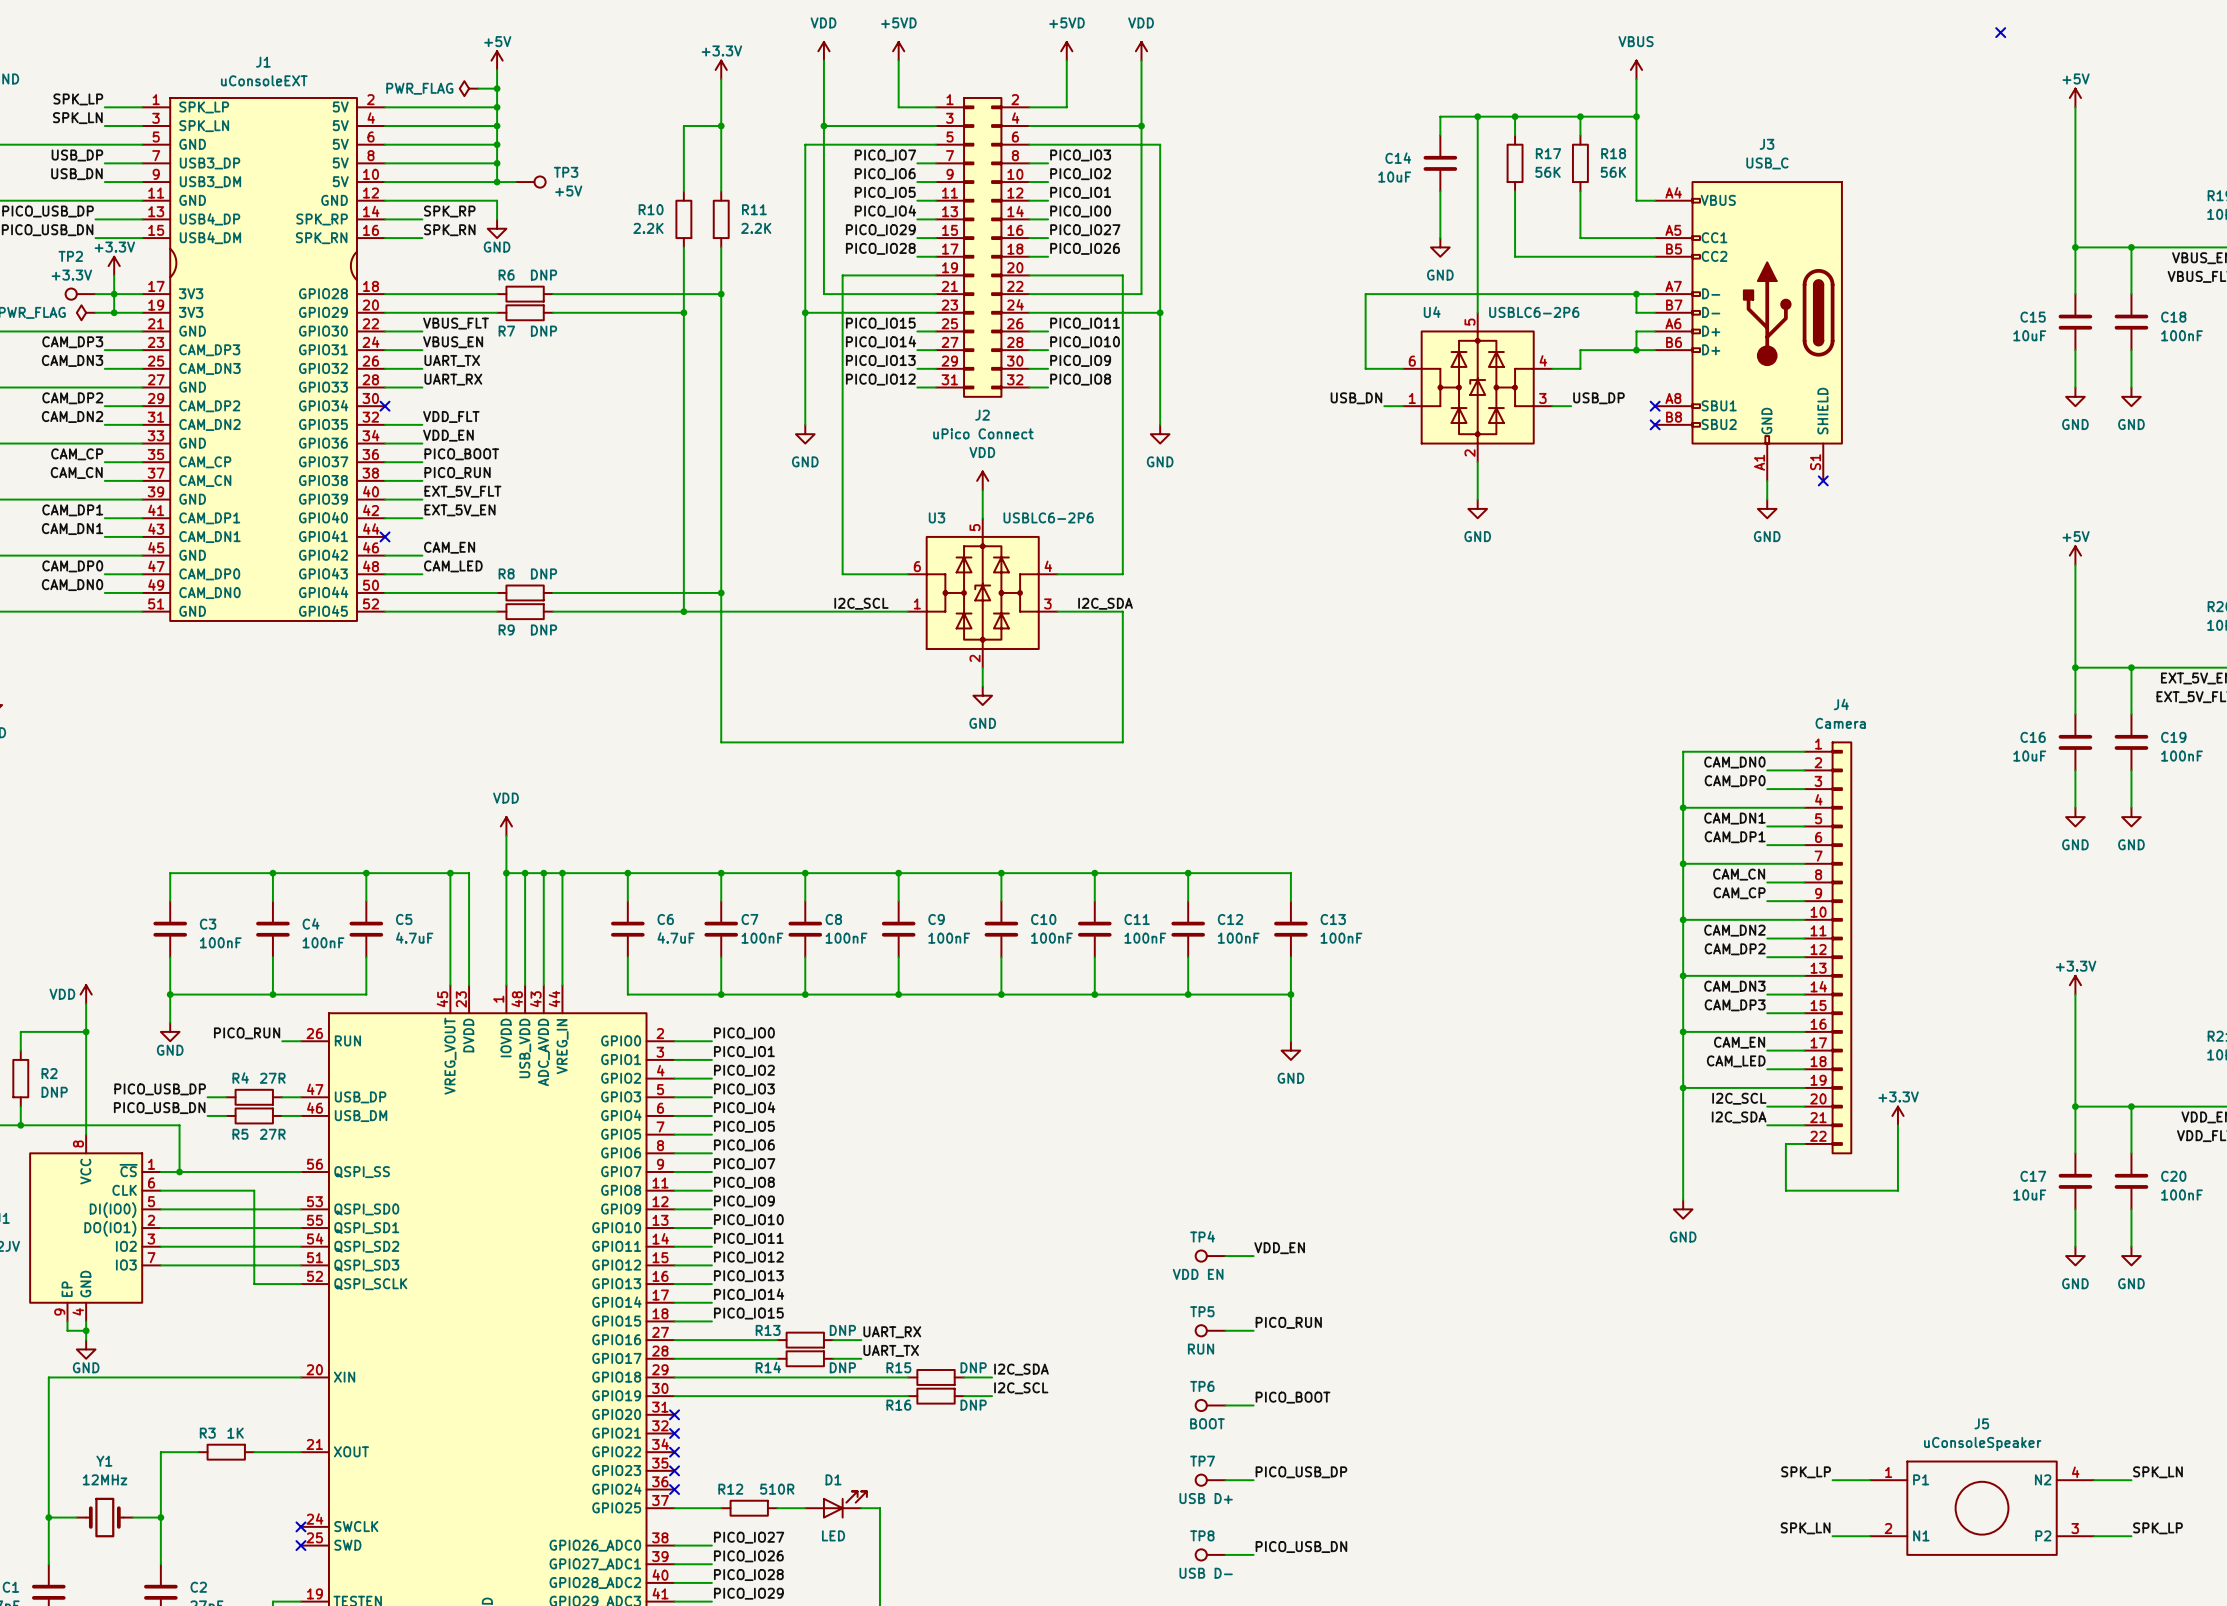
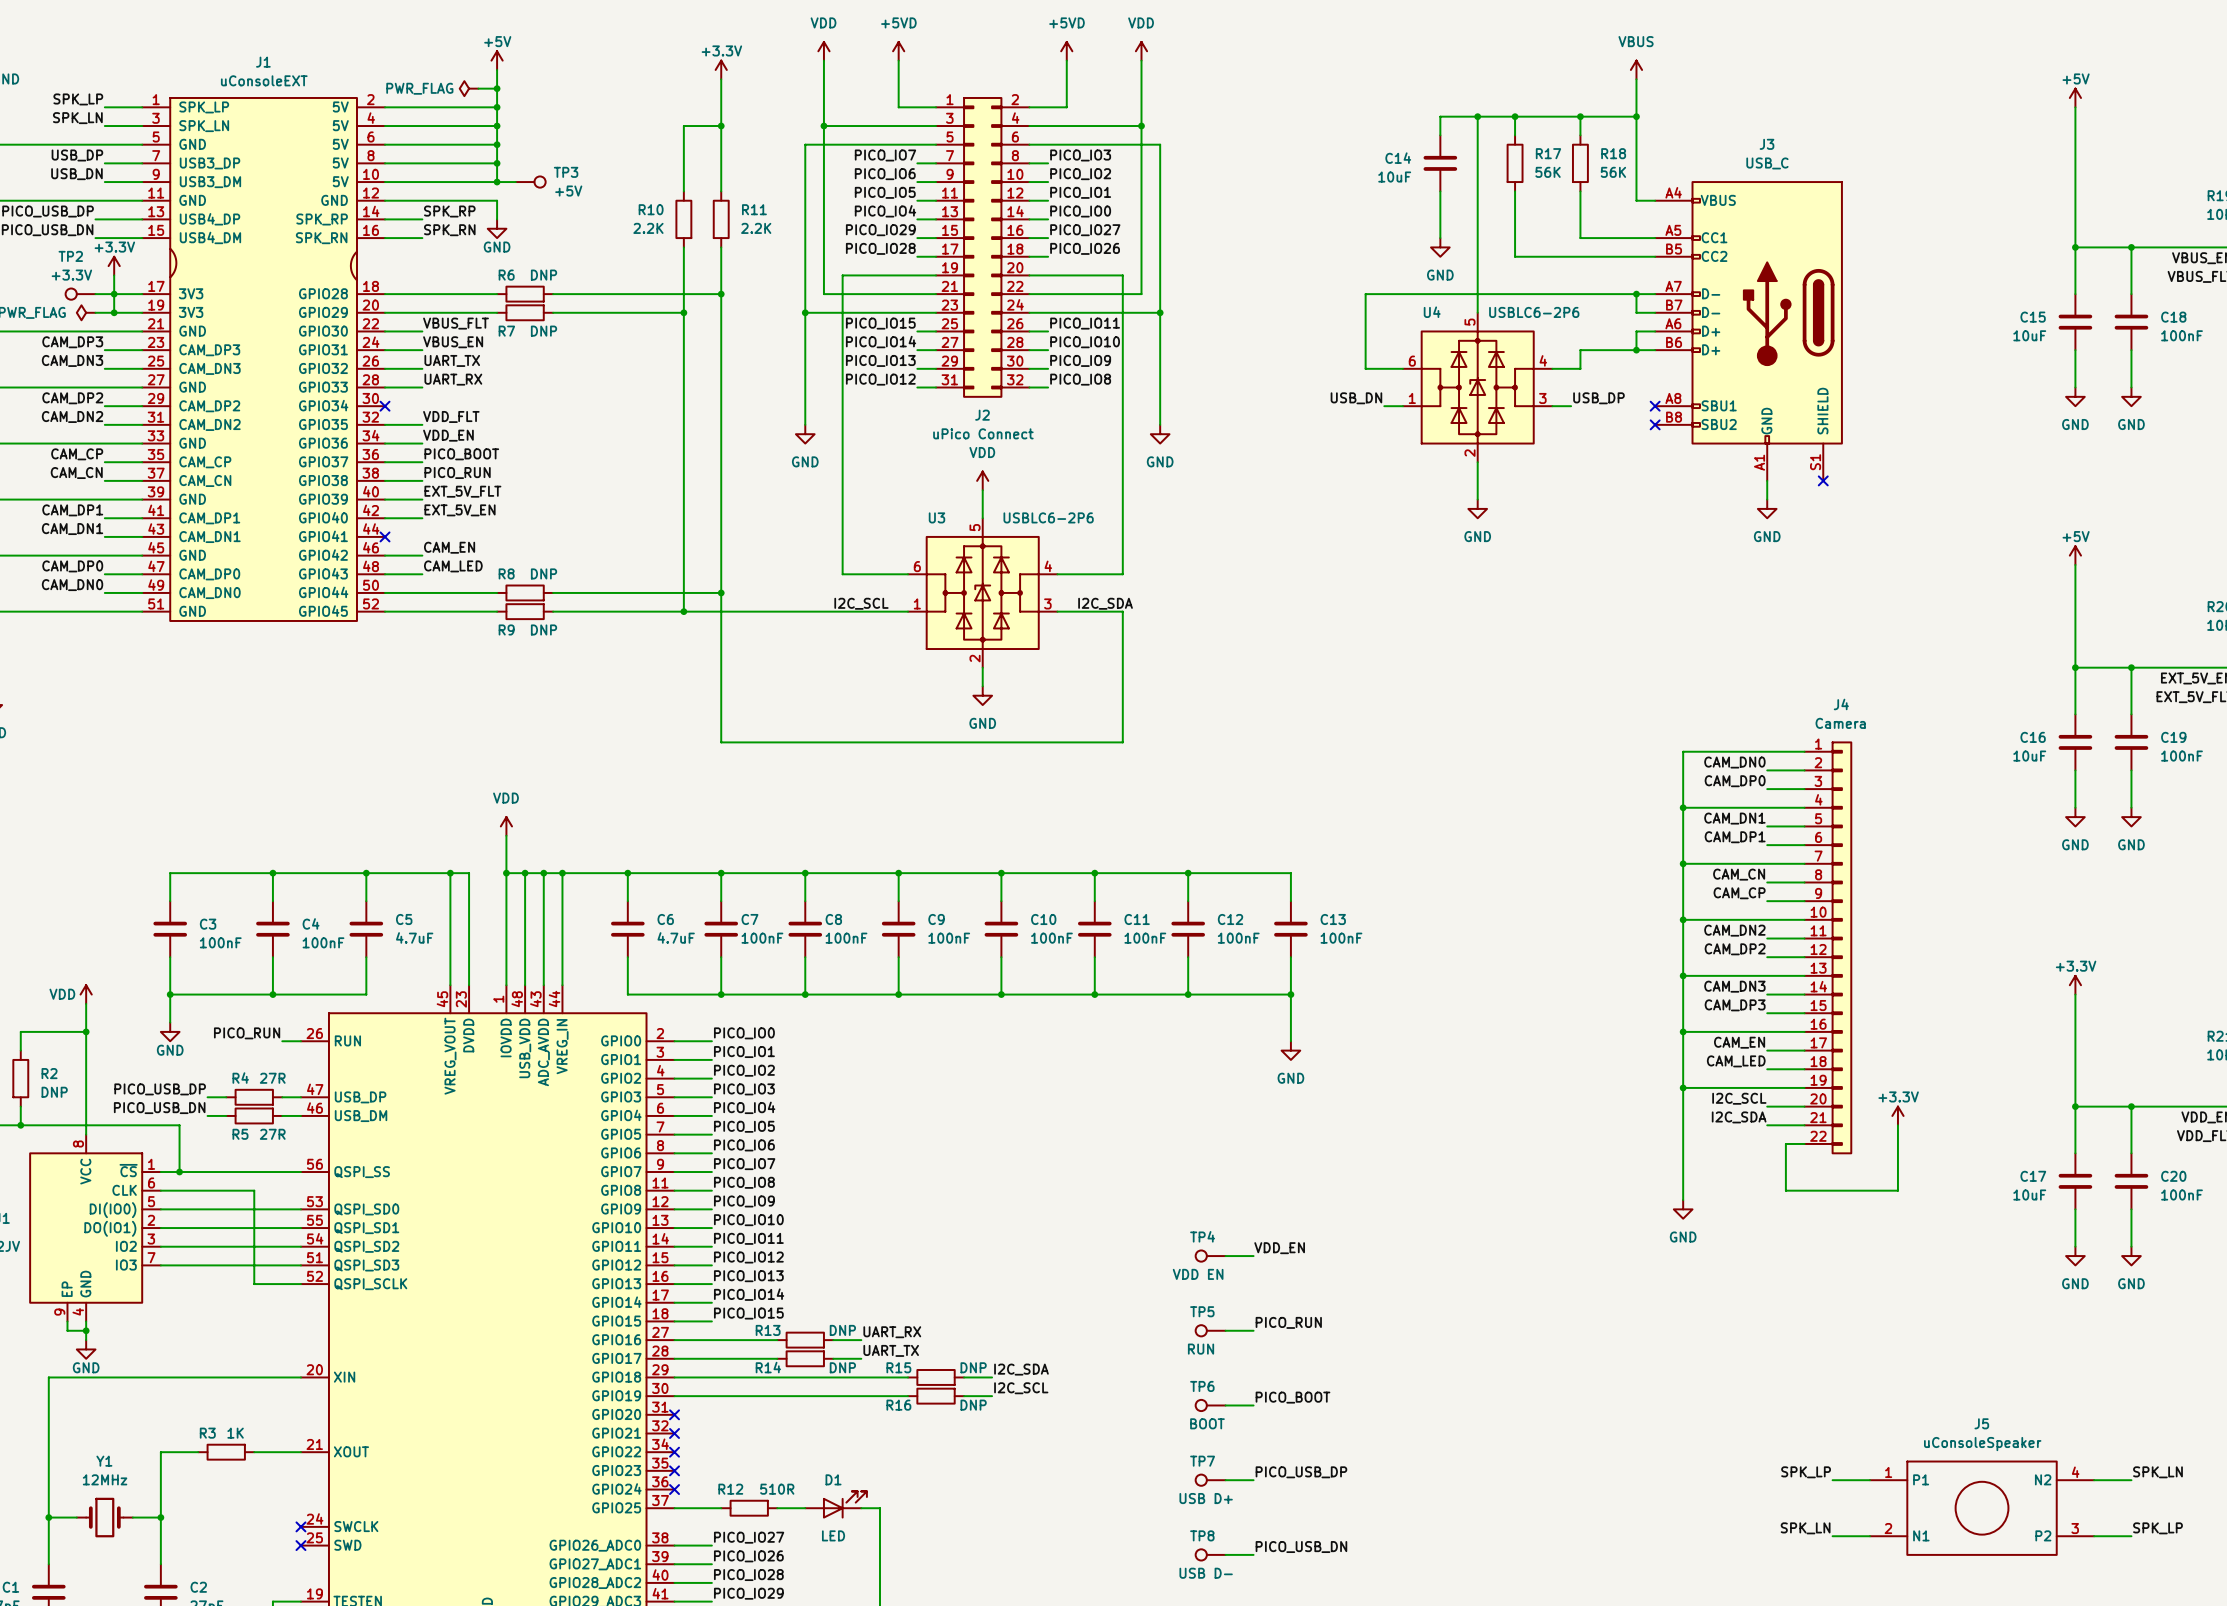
no-connect mark: (2000, 32) -> none

